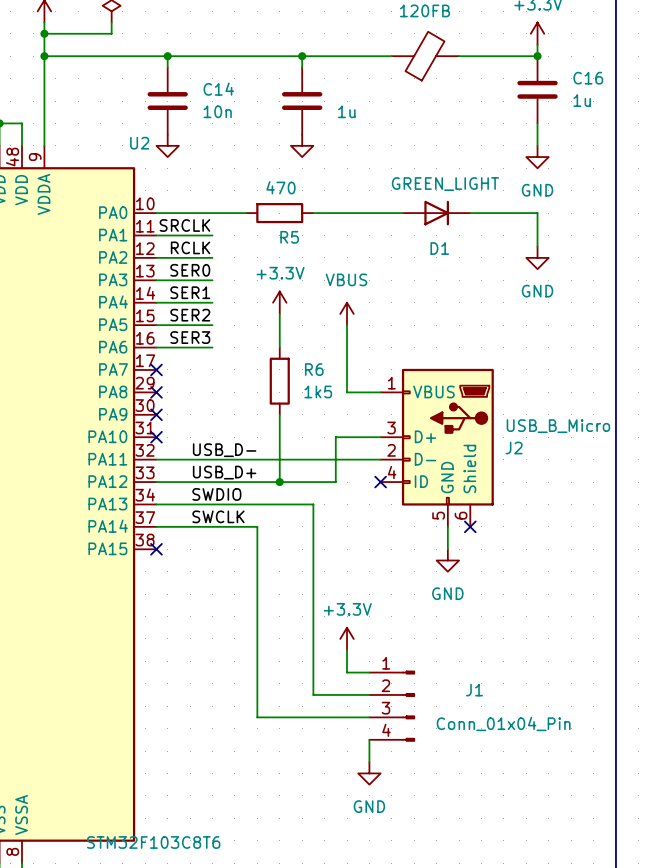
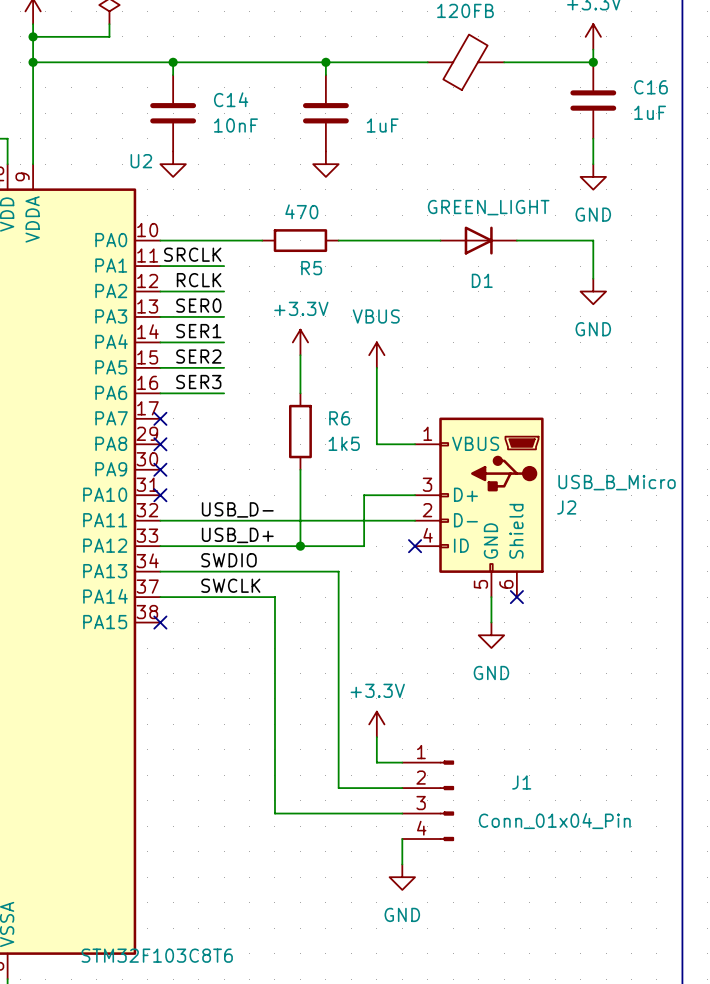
C16 value: 1u (582, 100) -> 1uF (650, 112)
C14 value: 10n (217, 111) -> 10nF (235, 125)
part value: 1u (346, 111) -> 1uF (382, 125)

